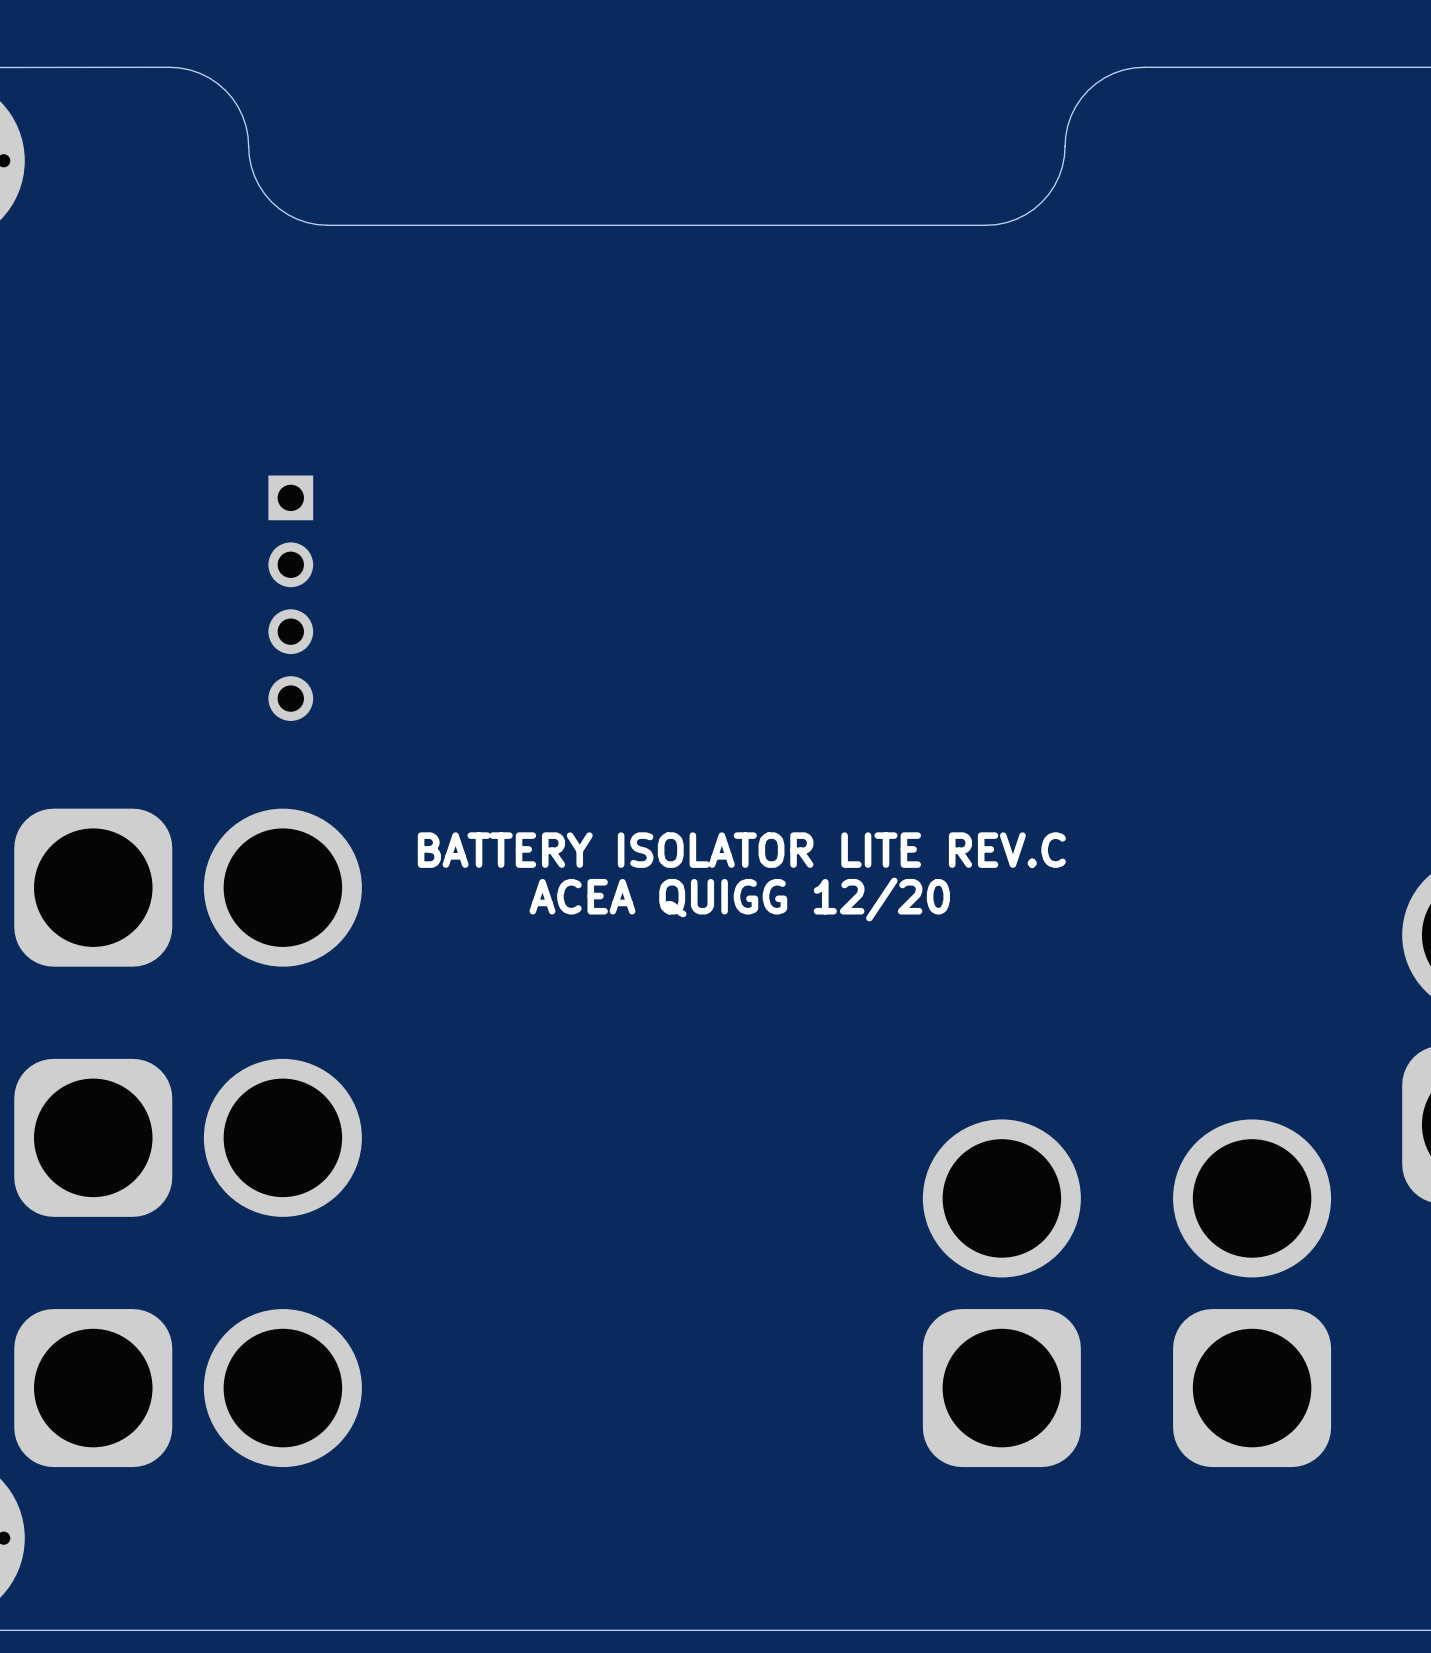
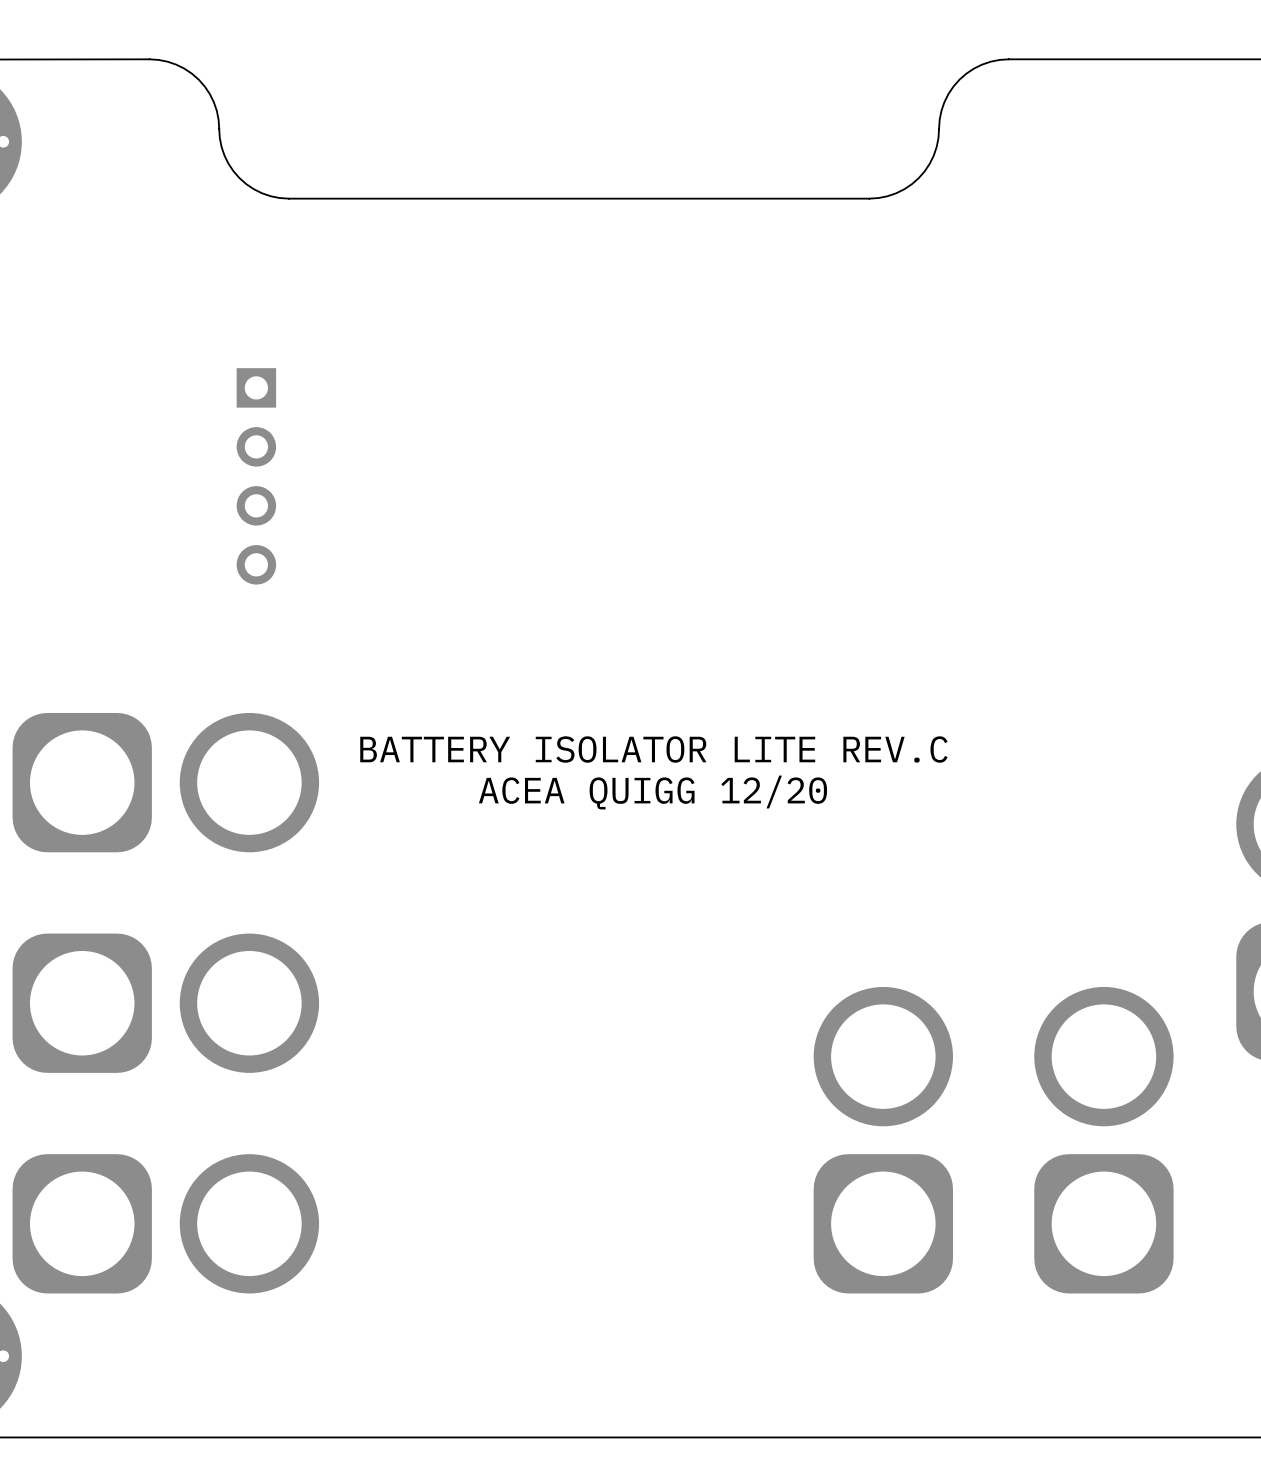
part position: (290, 598) -> (256, 476)

